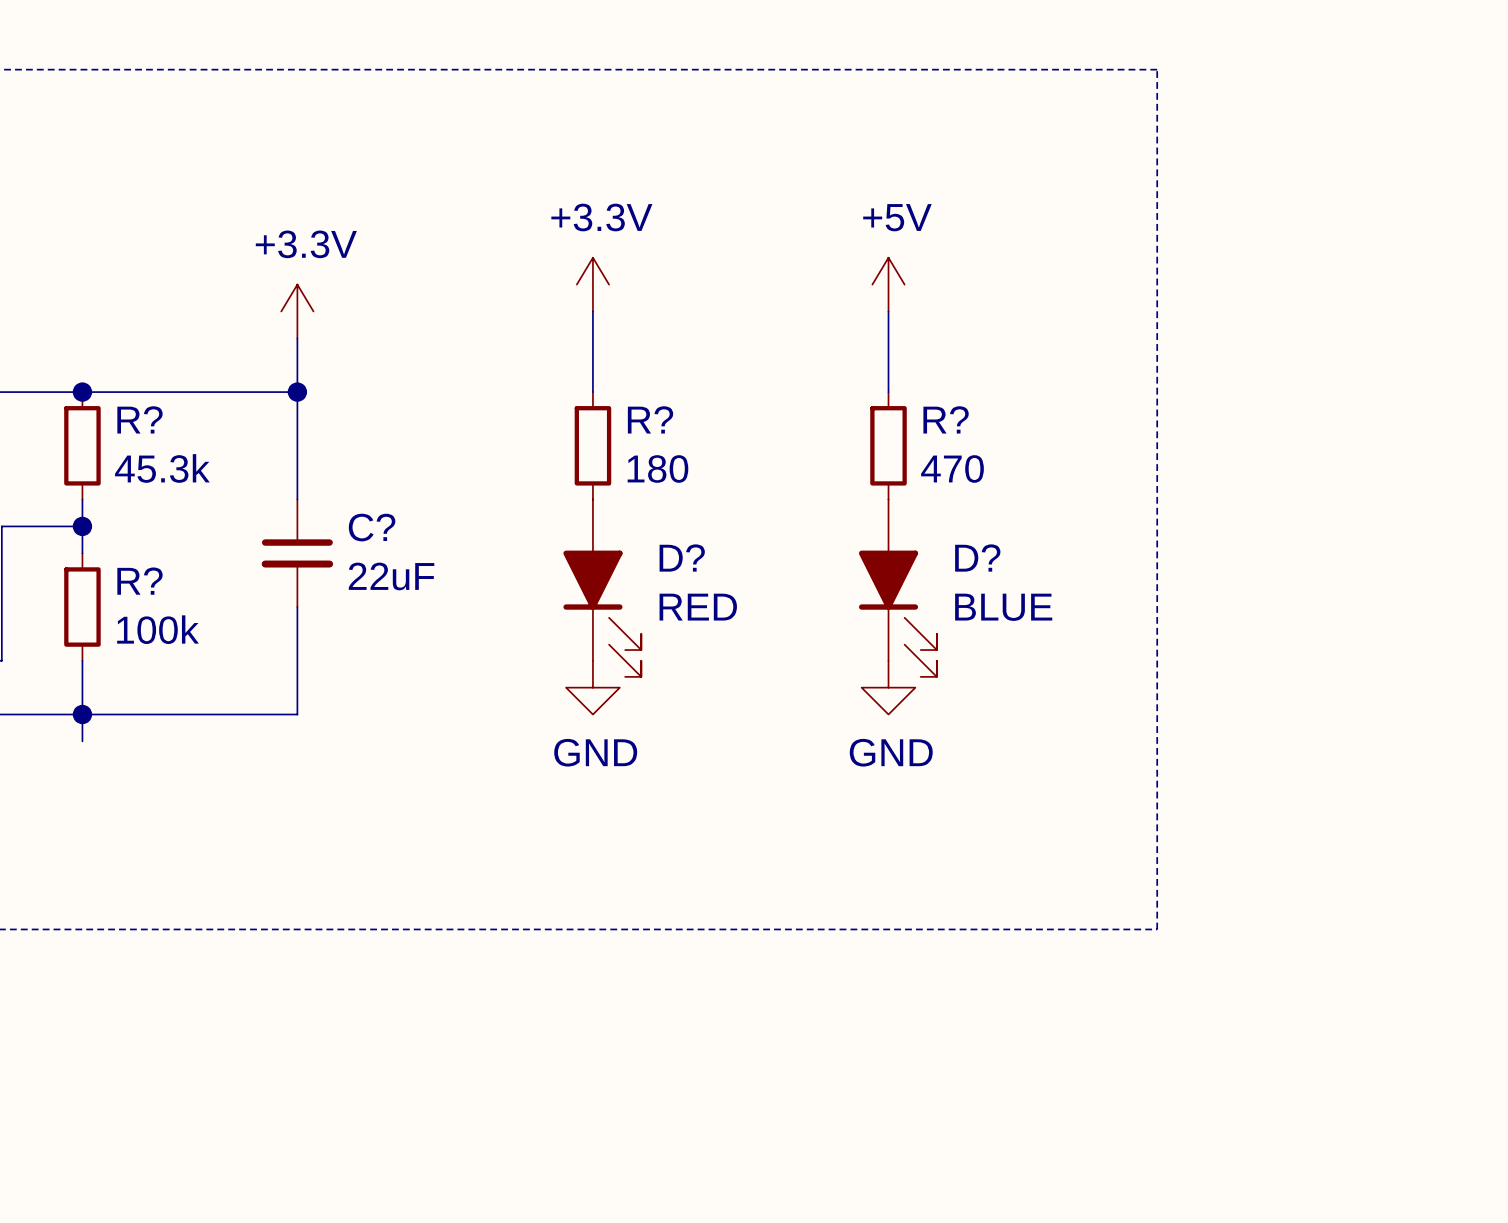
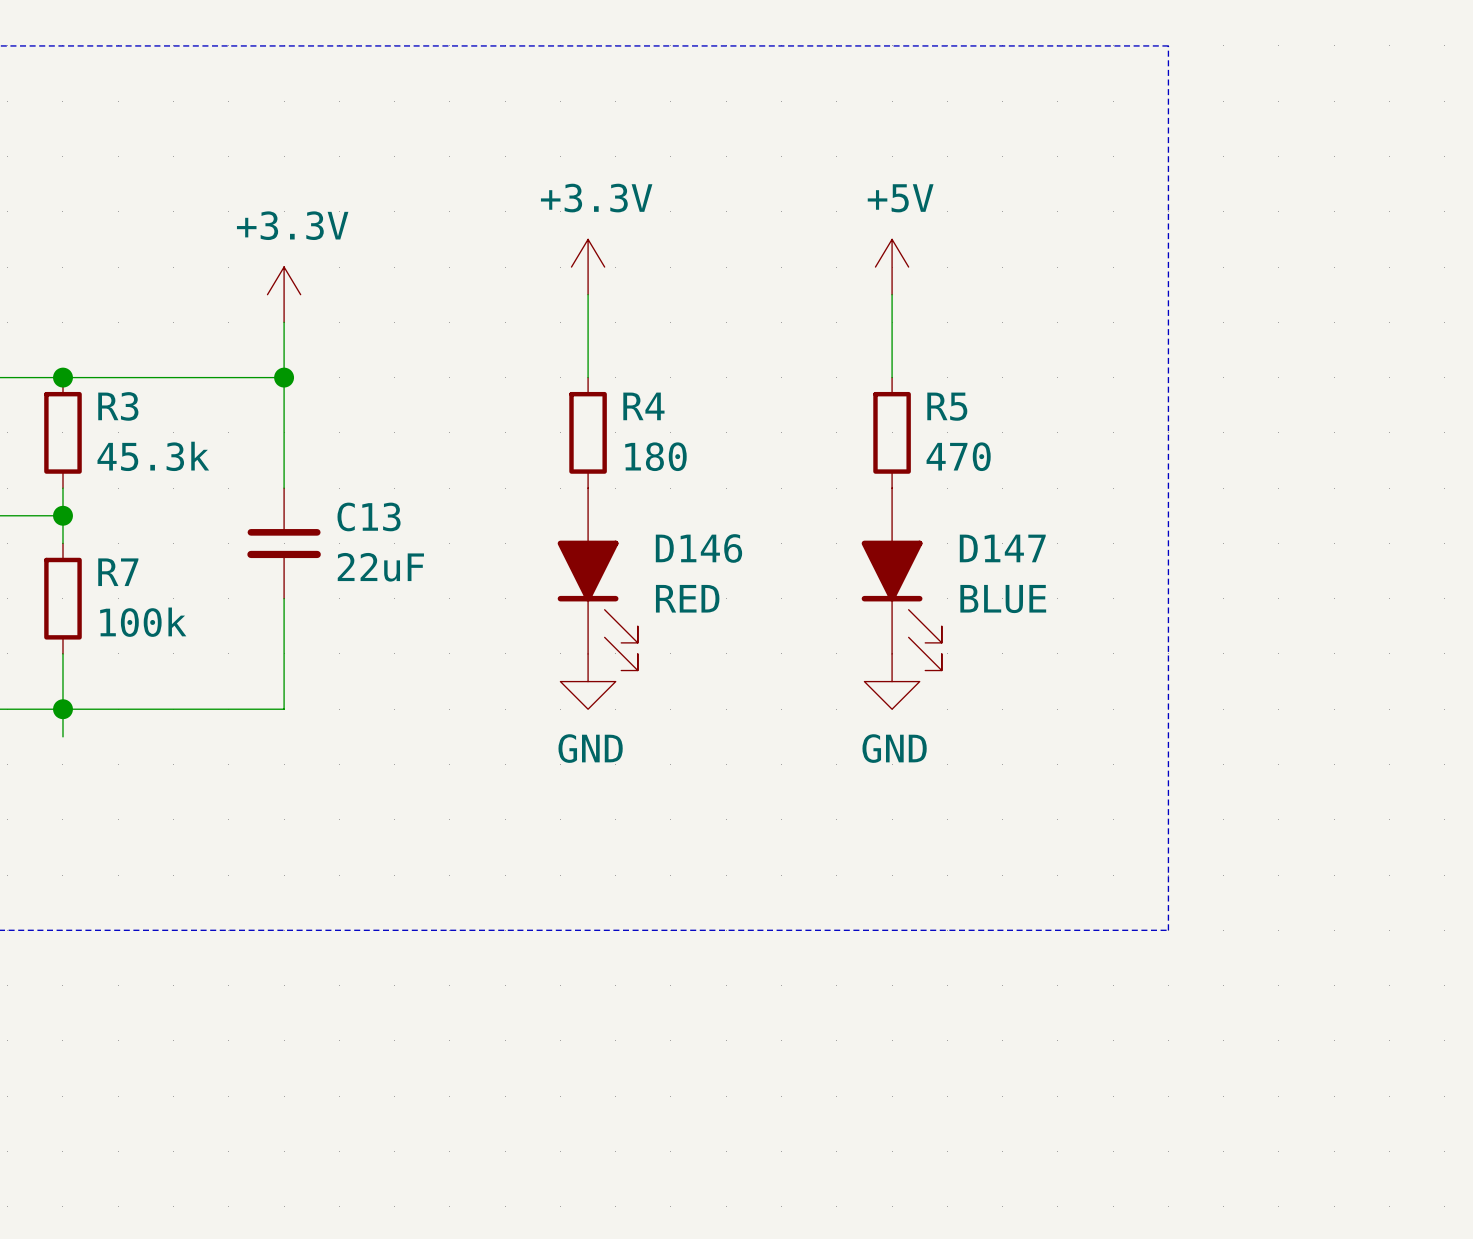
R? name: R? (139, 419) -> R3 (118, 406)
R? name: R? (650, 419) -> R4 (643, 406)
R? name: R? (946, 419) -> R5 (947, 406)
C? name: C? (372, 527) -> C13 (369, 516)
D? name: D? (682, 558) -> D146 (698, 548)
D? name: D? (977, 558) -> D147 (1002, 548)
R? name: R? (139, 581) -> R7 (118, 572)

